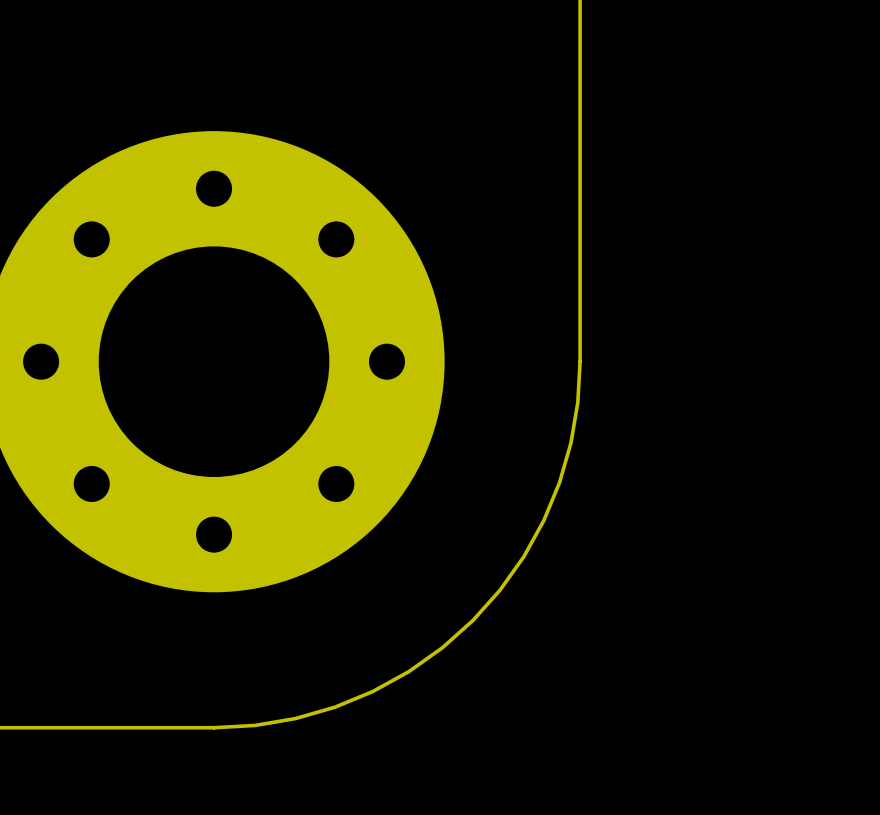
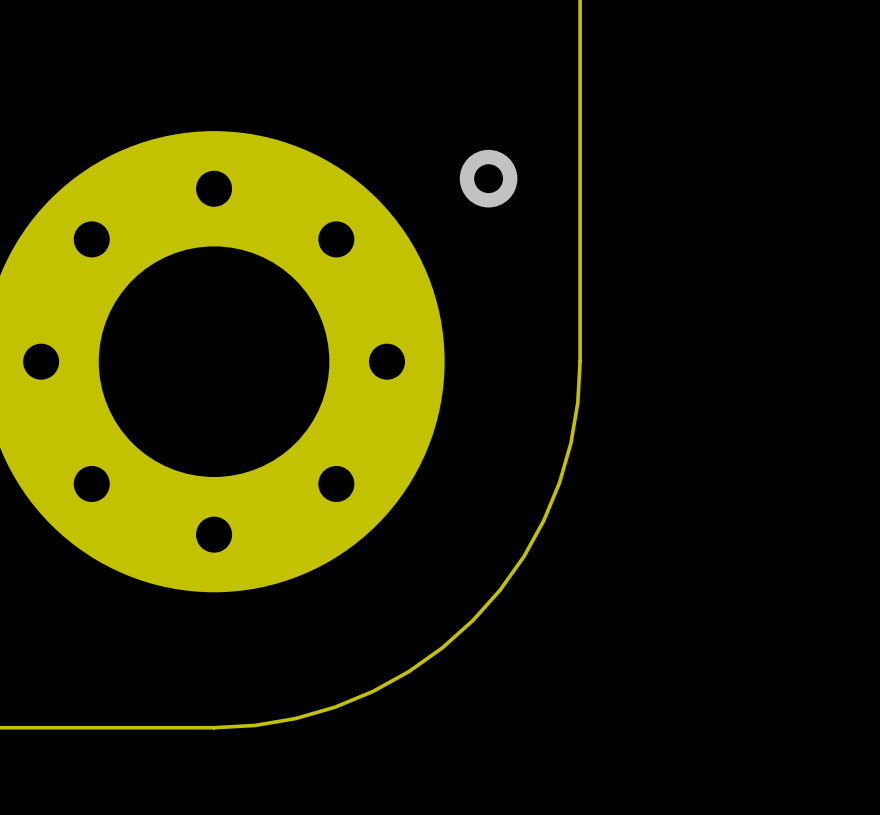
via: none -> (488, 178)

